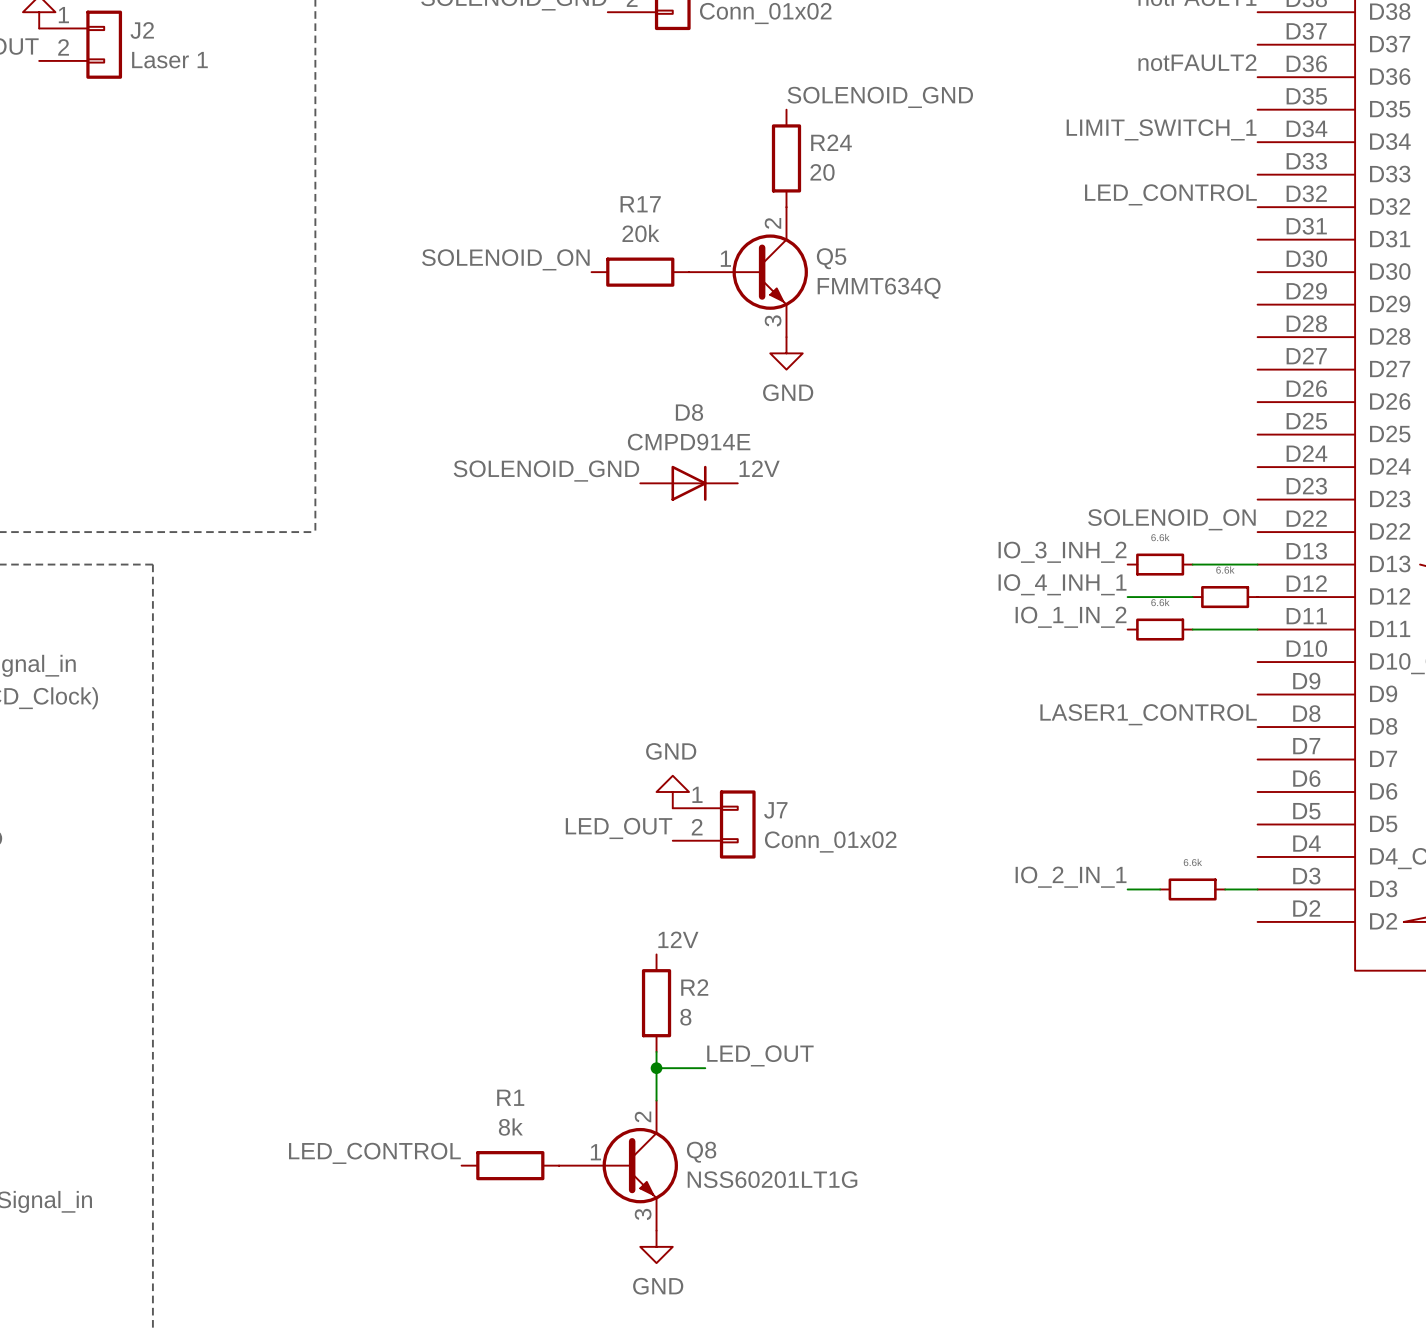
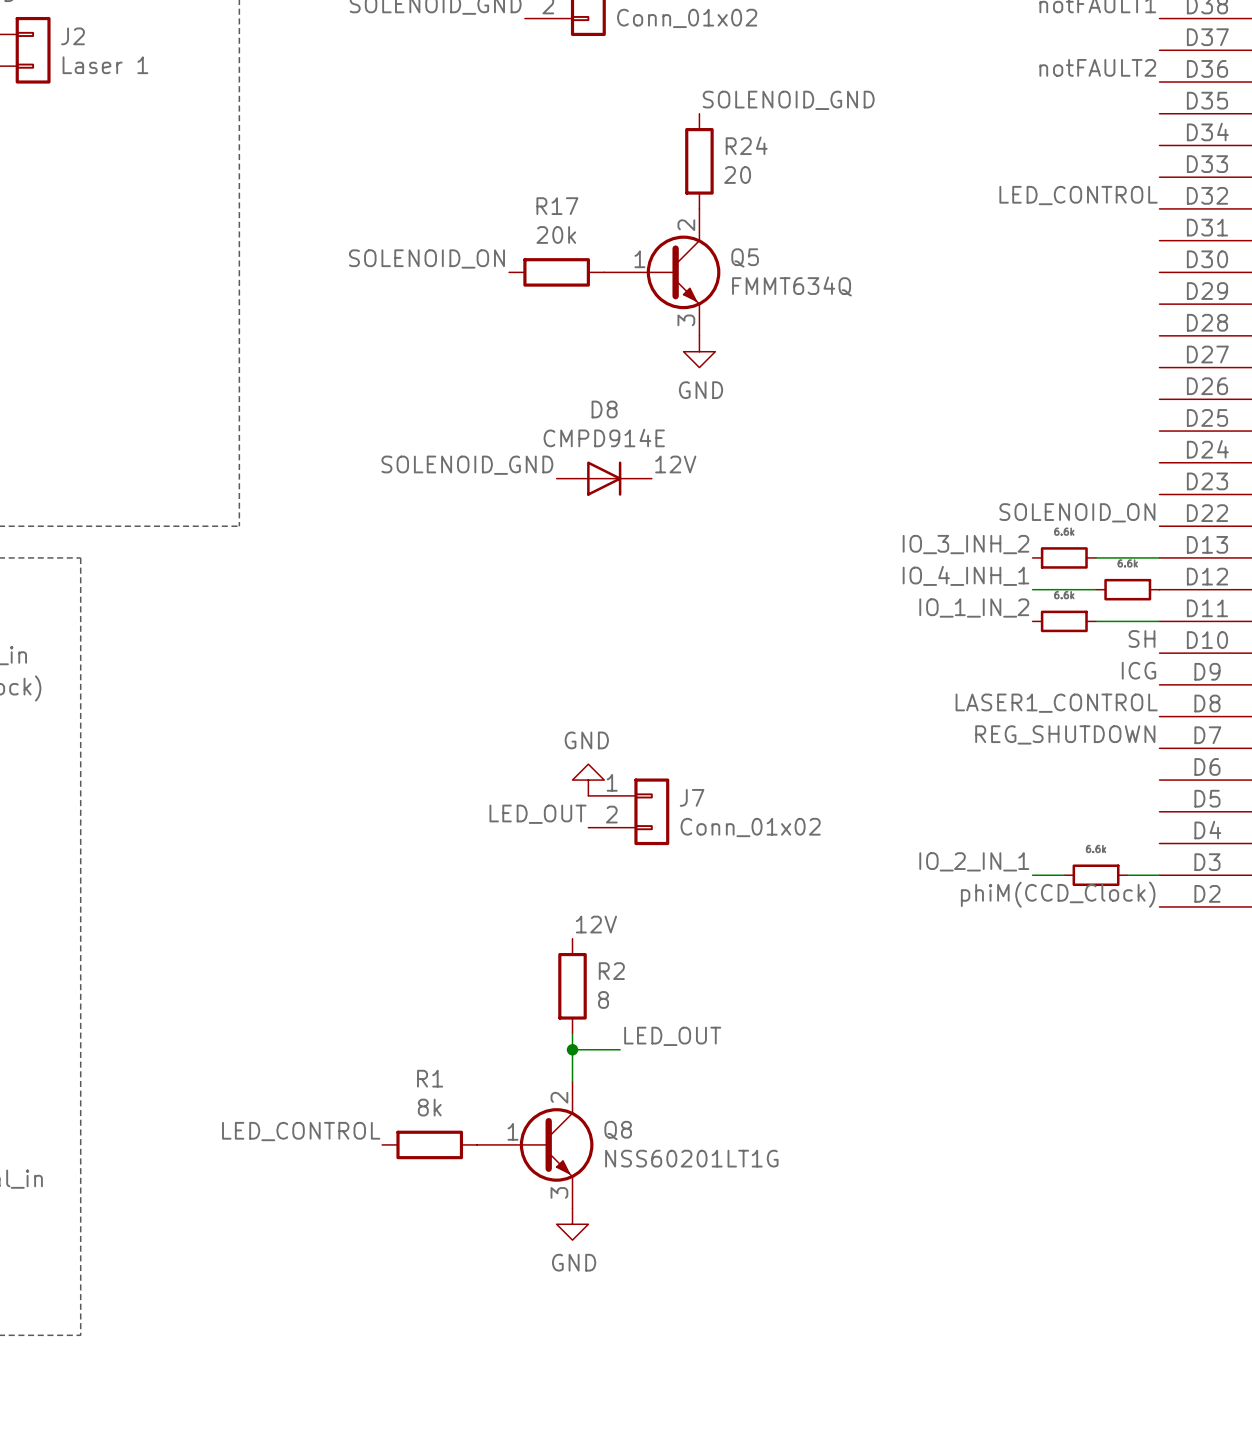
label: LIMIT_SWITCH_1 (1161, 129) -> none
label: none -> SH (1142, 638)
label: none -> ICG (1138, 670)
label: none -> REG_SHUTDOWN (1065, 734)
label: none -> phiM(CCD_Clock) (1058, 894)

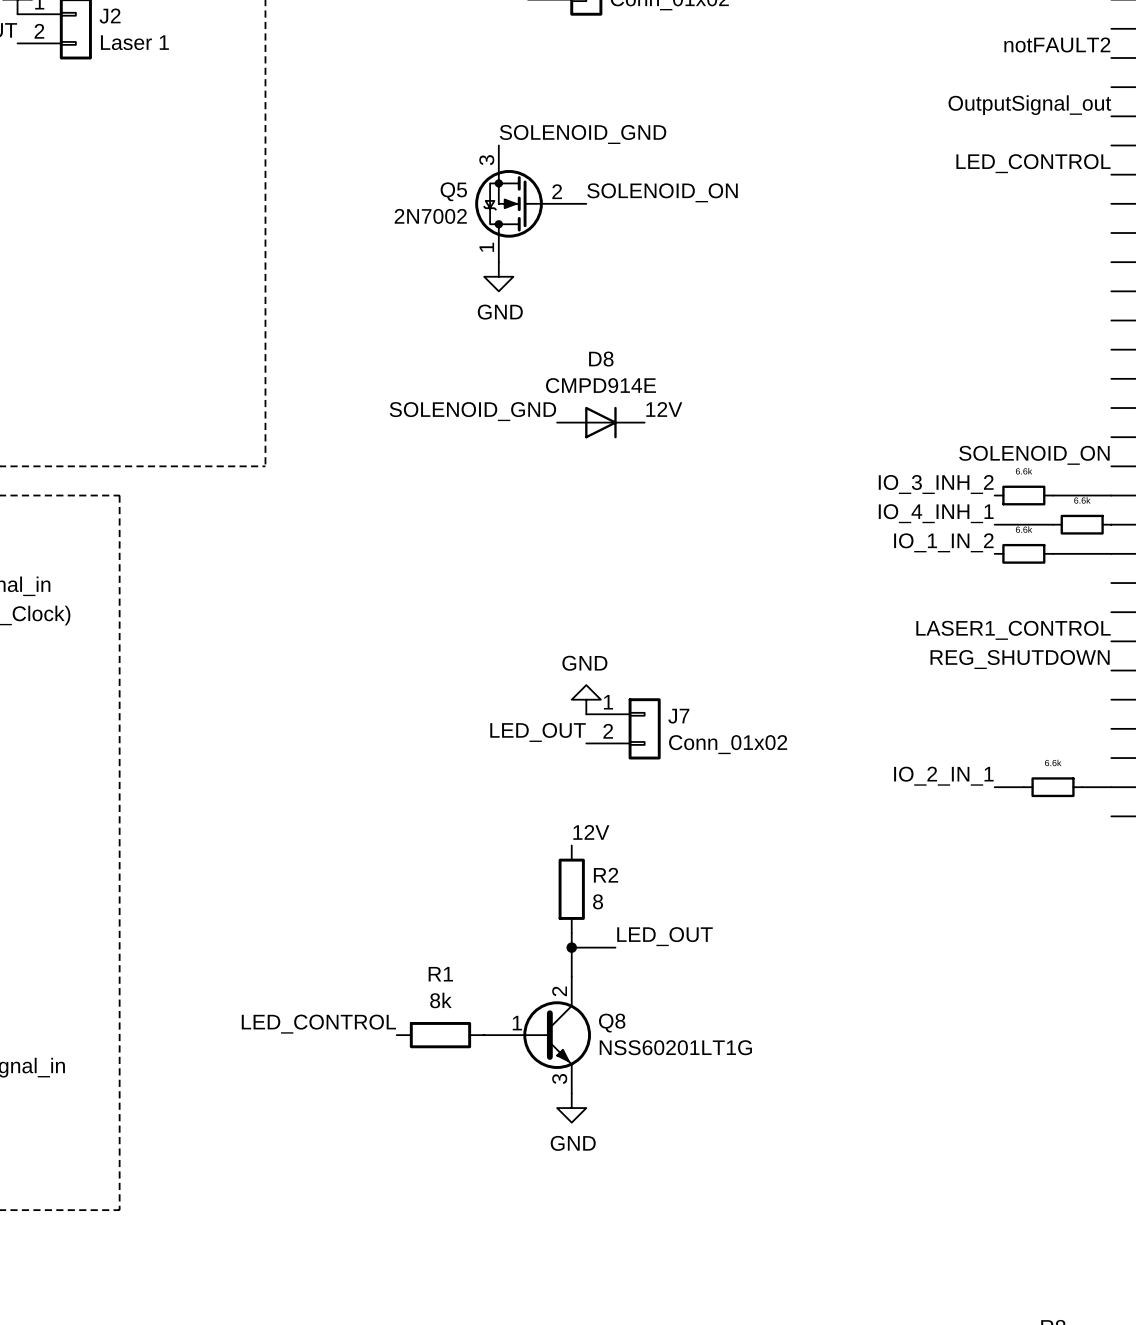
label position: SOLENOID_GND (788, 100) -> SOLENOID_GND (583, 134)
label: none -> OutputSignal_out (1029, 105)
R24: 20 (699, 161) -> none
Q5 symbol: [604, 208, 721, 336] -> [475, 145, 587, 263]
Q5 name position: Q5 (745, 257) -> Q5 (453, 191)
label position: SOLENOID_ON (426, 258) -> SOLENOID_ON (662, 192)
R17: 20k (556, 272) -> none
Q5 value: FMMT634Q (791, 286) -> 2N7002 (430, 216)
power symbol position: GND (699, 351) -> GND (498, 276)
label: SH (1142, 638) -> none
label: ICG (1138, 670) -> none
label: phiM(CCD_Clock) (1058, 894) -> none

